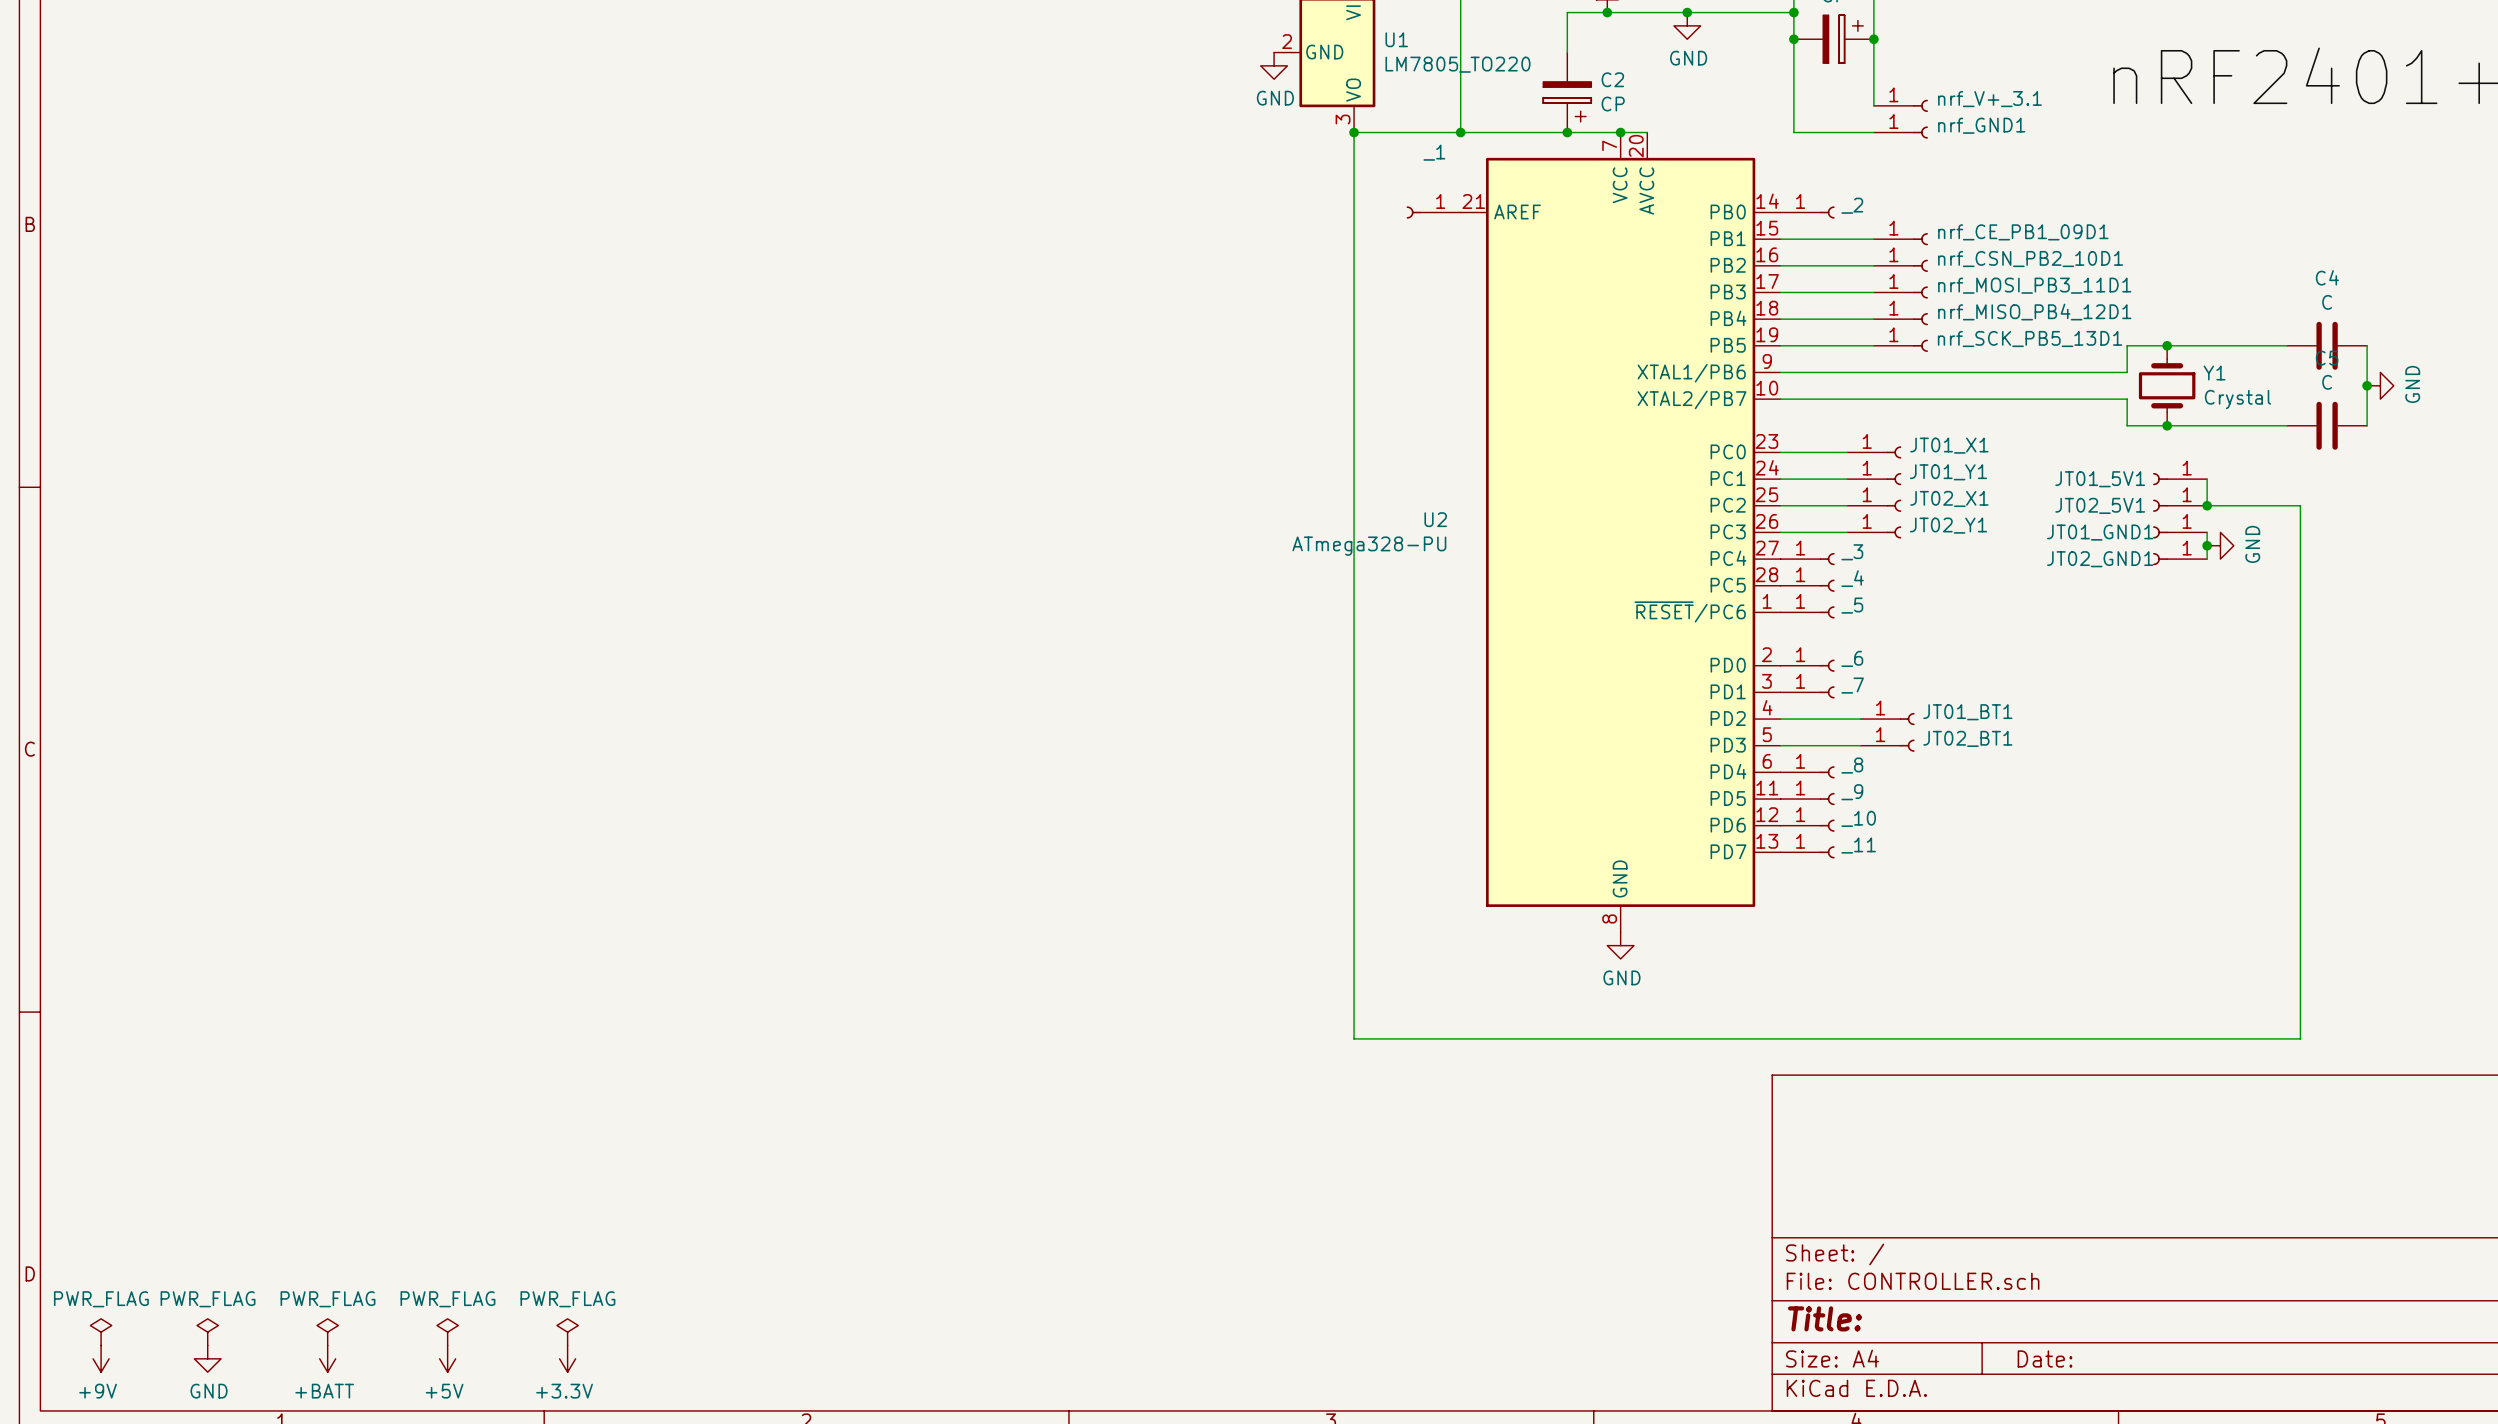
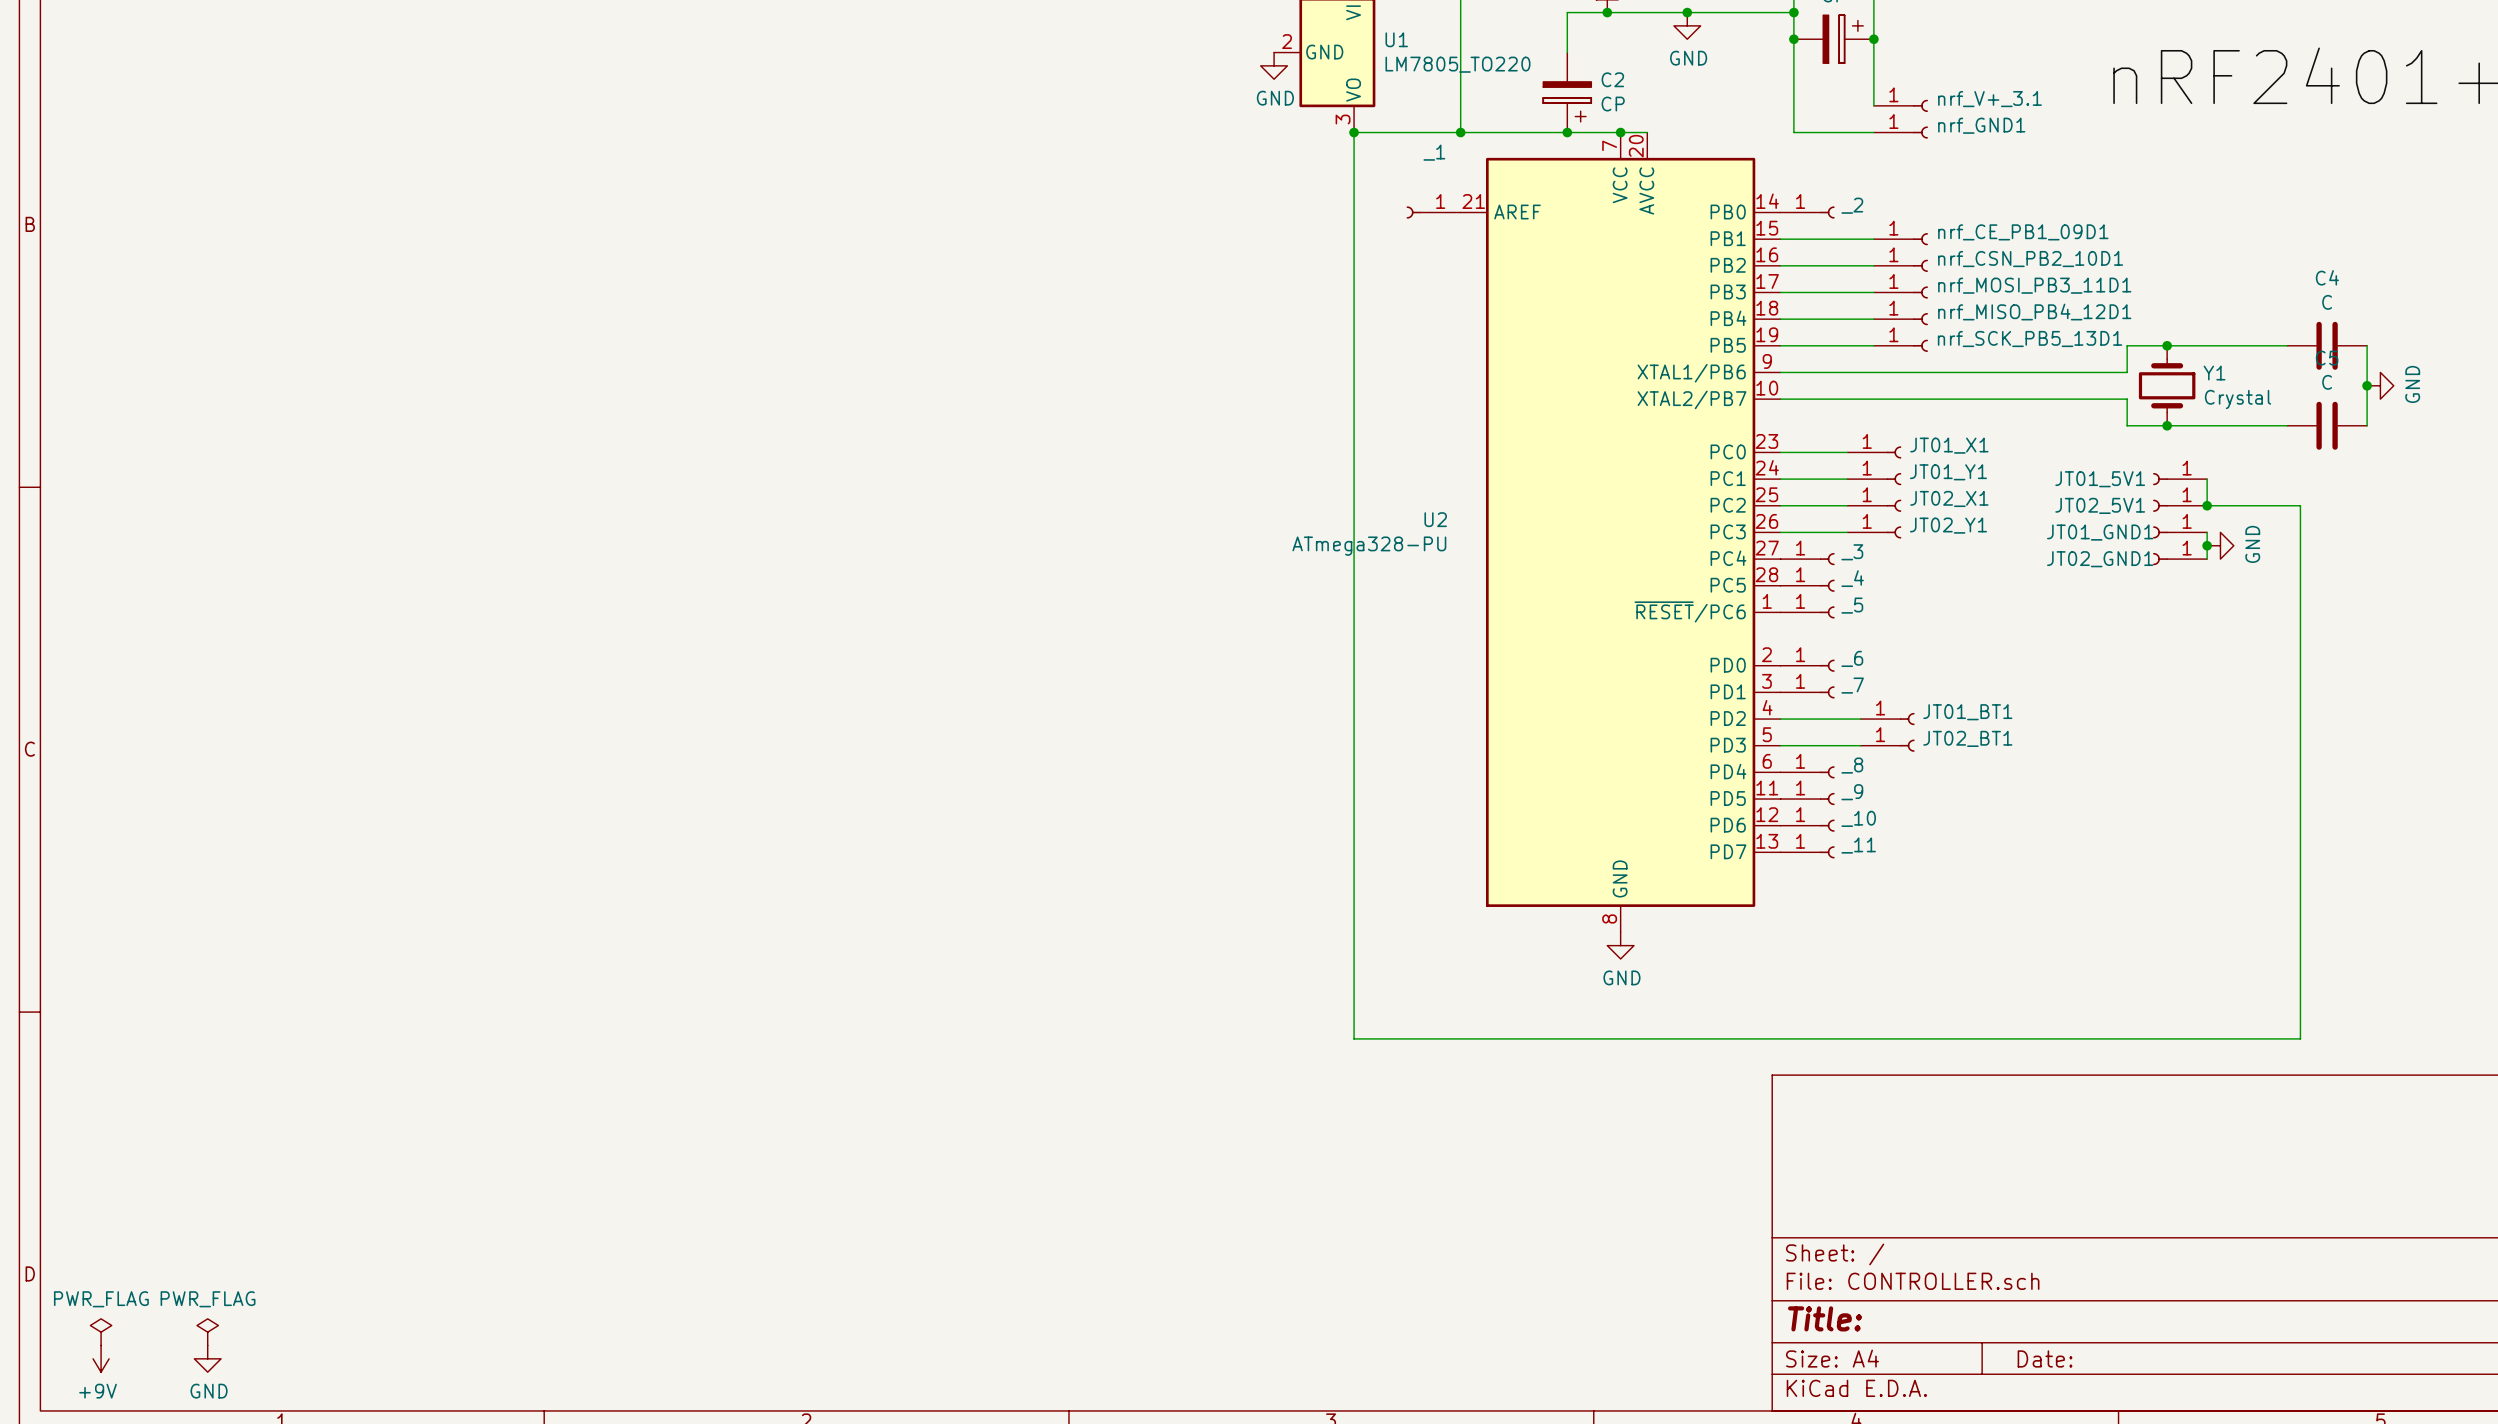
power symbol: PWR_FLAG (327, 1332) -> none
power symbol: PWR_FLAG (447, 1332) -> none
power symbol: PWR_FLAG (567, 1332) -> none
power symbol: +BATT (327, 1358) -> none
power symbol: +5V (447, 1358) -> none
power symbol: +3.3V (567, 1358) -> none

